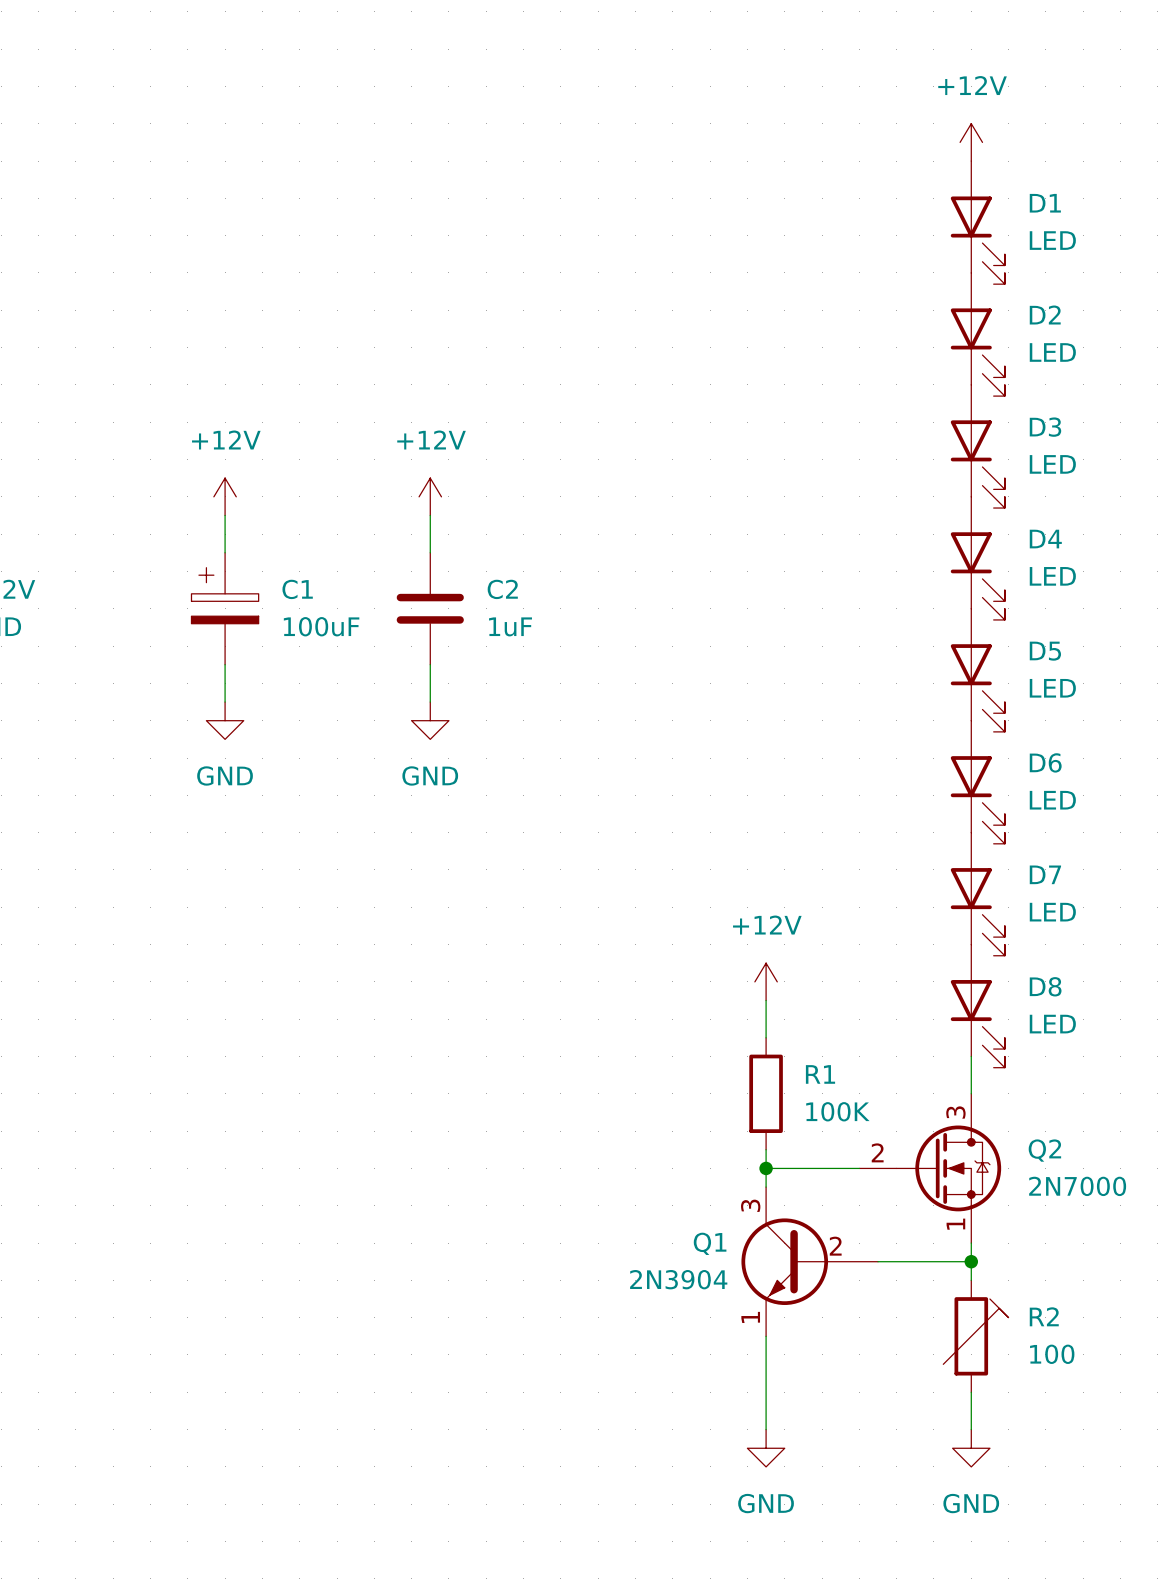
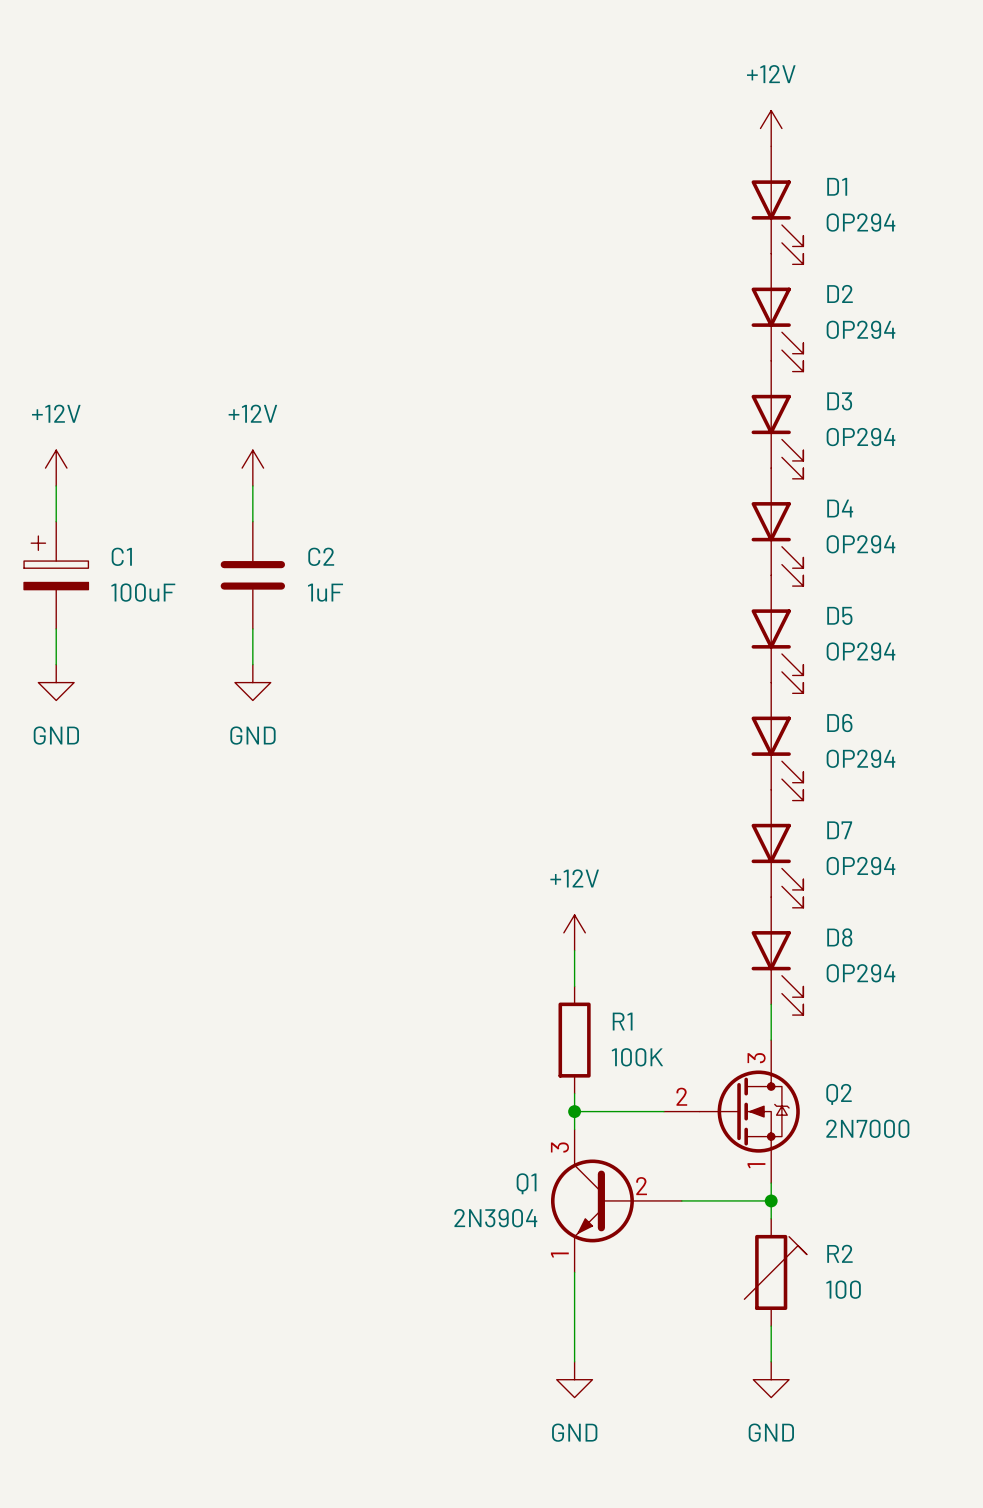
D1 value: LED (1052, 240) -> OP294 (861, 222)
D2 value: LED (1052, 352) -> OP294 (861, 329)
D3 value: LED (1052, 464) -> OP294 (861, 437)
D4 value: LED (1052, 576) -> OP294 (861, 544)
D5 value: LED (1052, 688) -> OP294 (861, 651)
D6 value: LED (1052, 800) -> OP294 (861, 758)
D7 value: LED (1052, 912) -> OP294 (861, 866)
D8 value: LED (1052, 1024) -> OP294 (861, 973)

